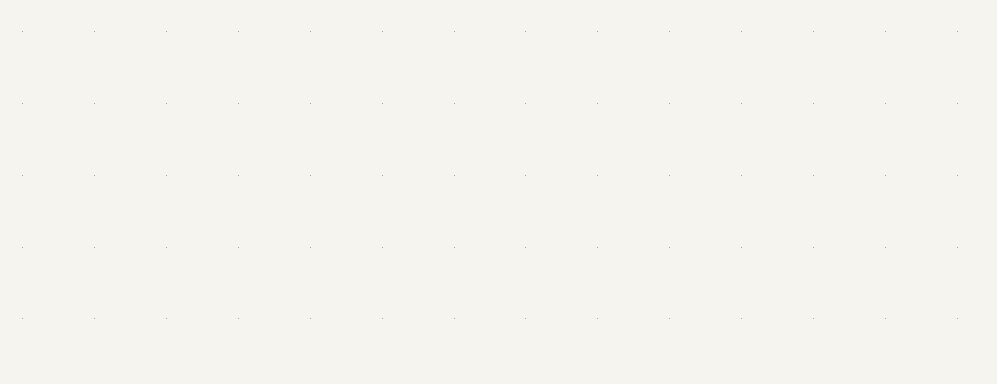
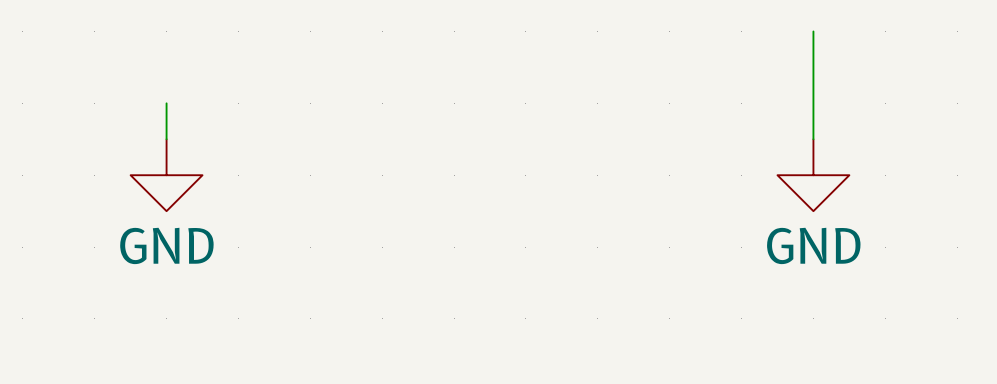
wire: none -> (813, 31) (813, 139)
wire: none -> (166, 103) (166, 139)
power symbol: none -> GND (166, 175)
power symbol: none -> GND (813, 175)

